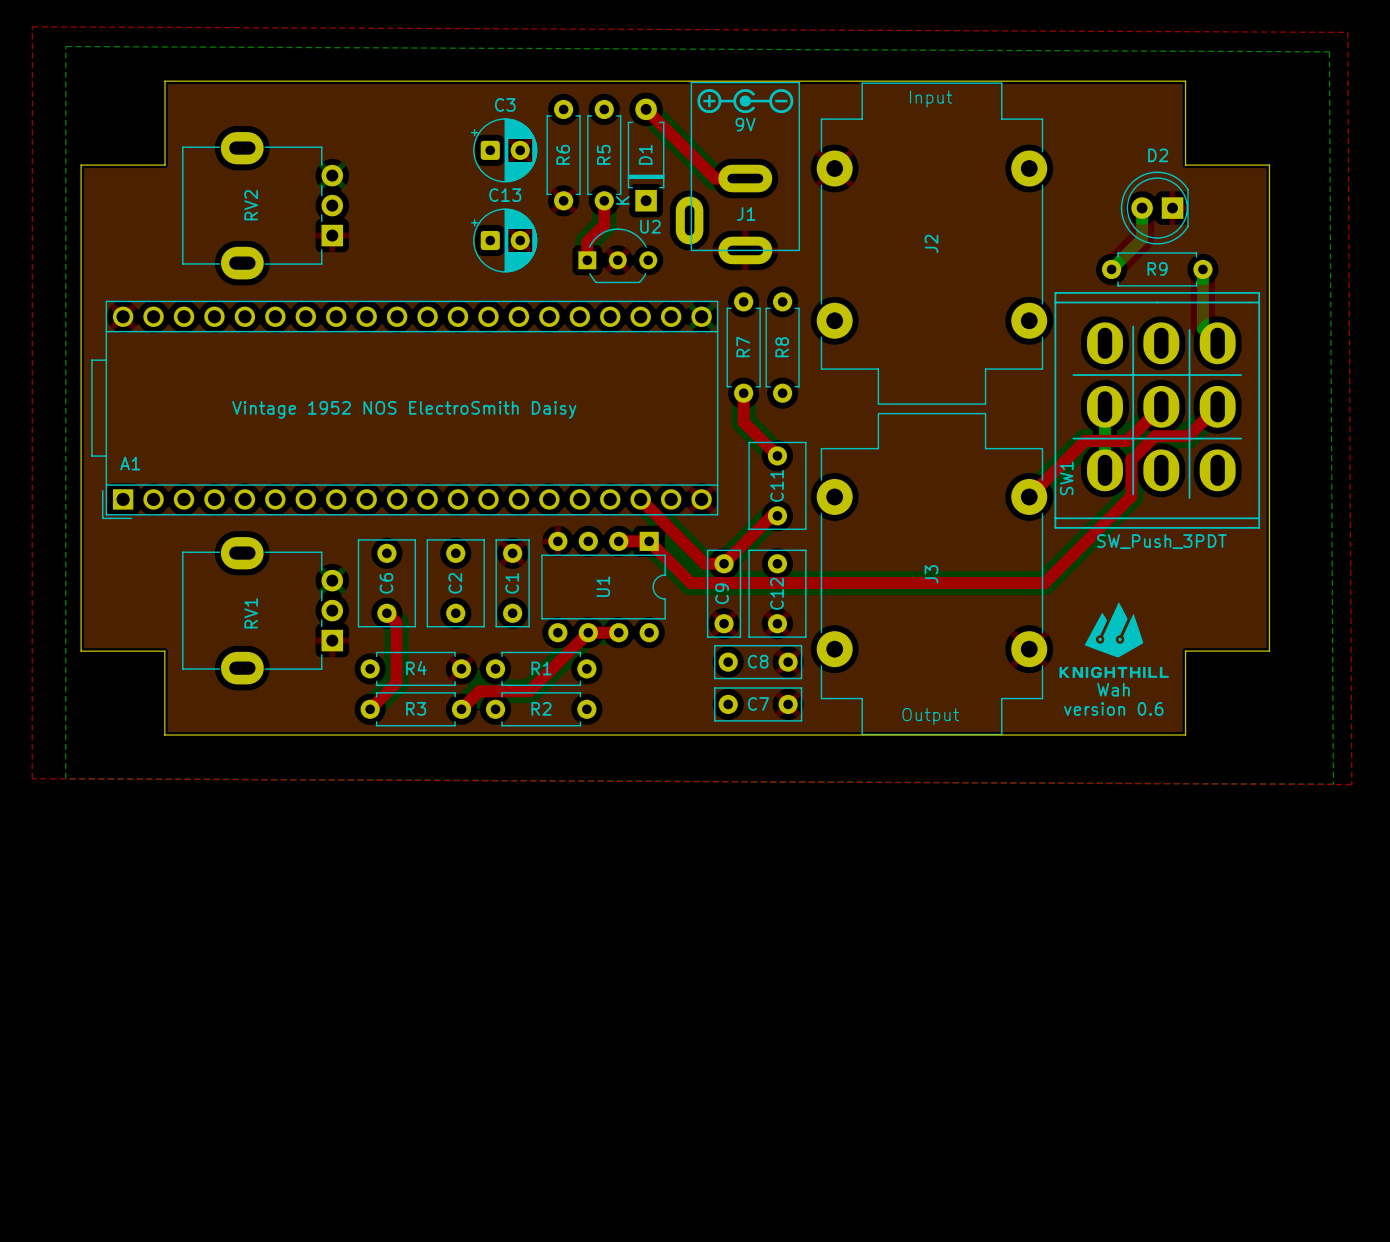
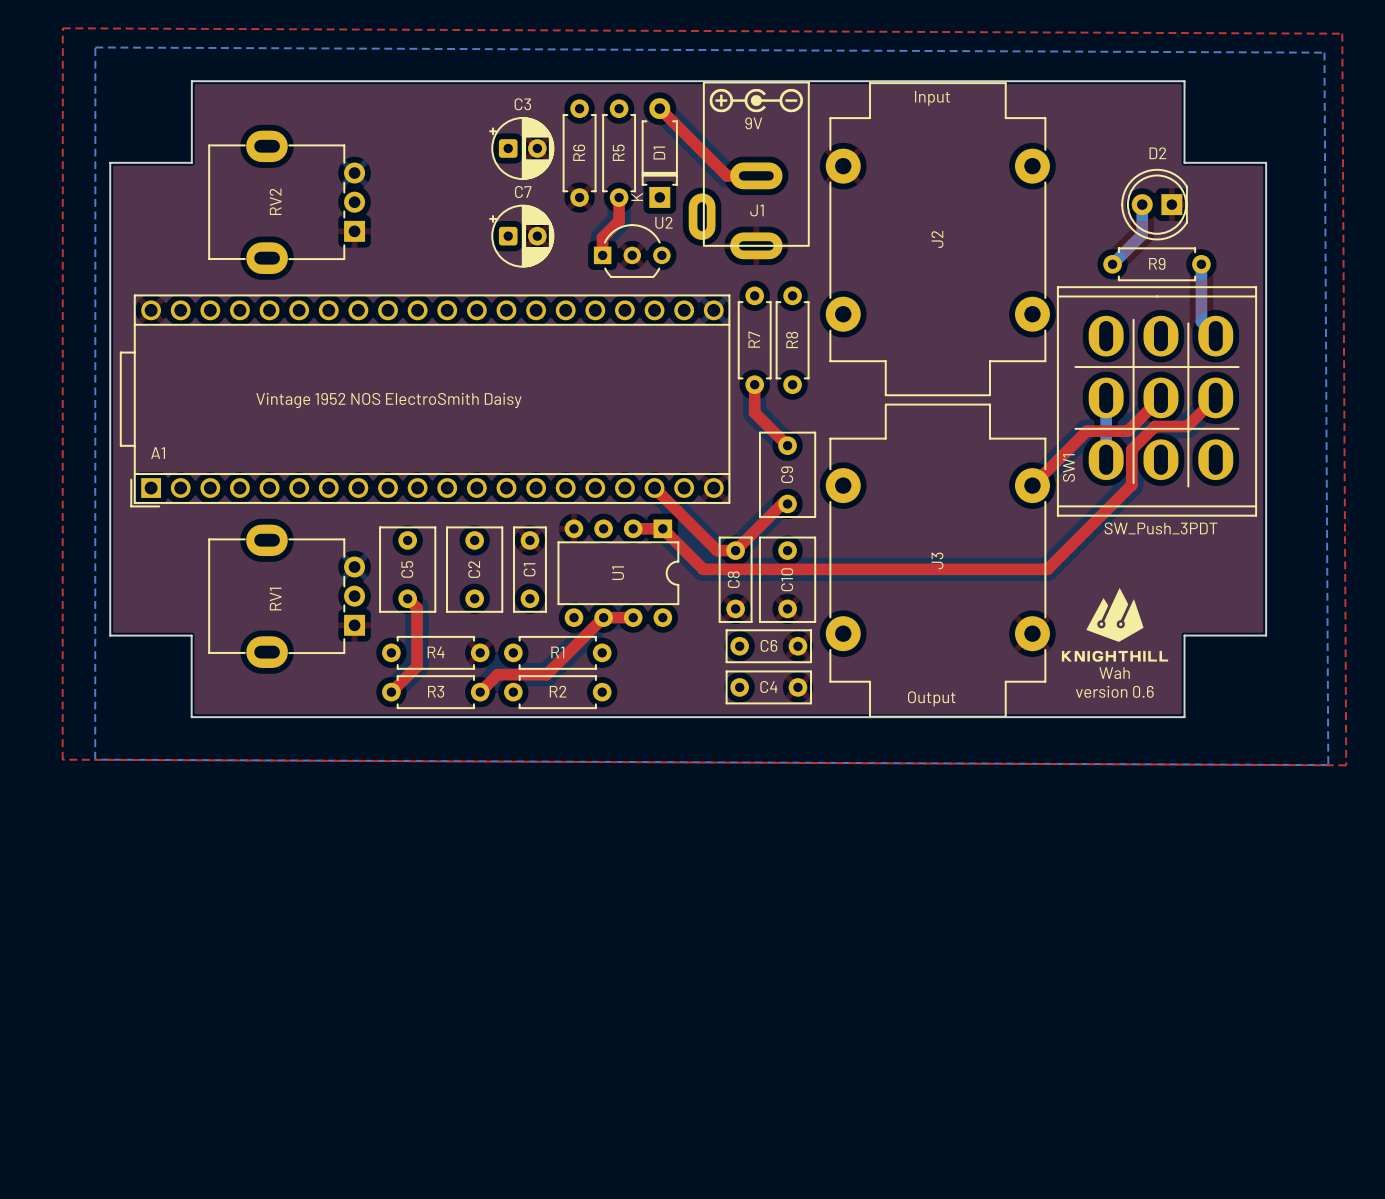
C13 name: C13 (505, 195) -> C7 (523, 192)
C11 name: C11 (777, 485) -> C9 (787, 474)
C6 name: C6 (386, 583) -> C5 (407, 569)
C9 name: C9 (722, 593) -> C8 (733, 579)
C12 name: C12 (777, 593) -> C10 (787, 579)
C8 name: C8 (758, 661) -> C6 (768, 645)
C7 name: C7 (758, 703) -> C4 (768, 686)

